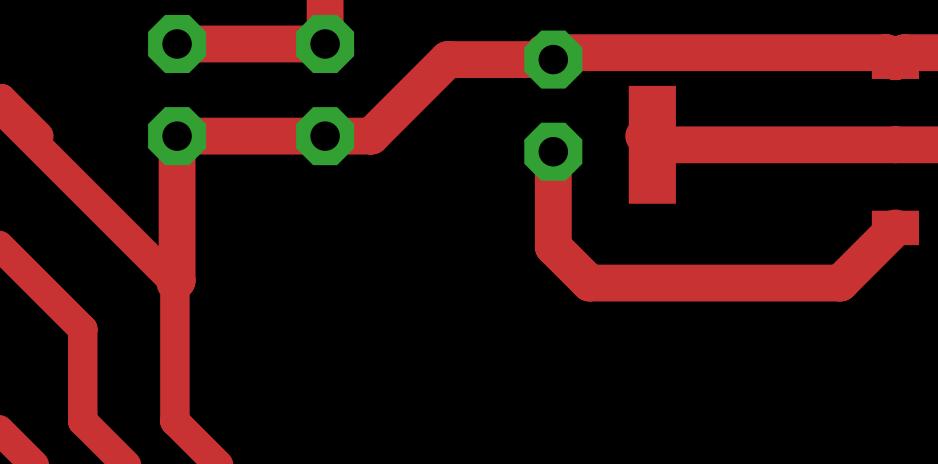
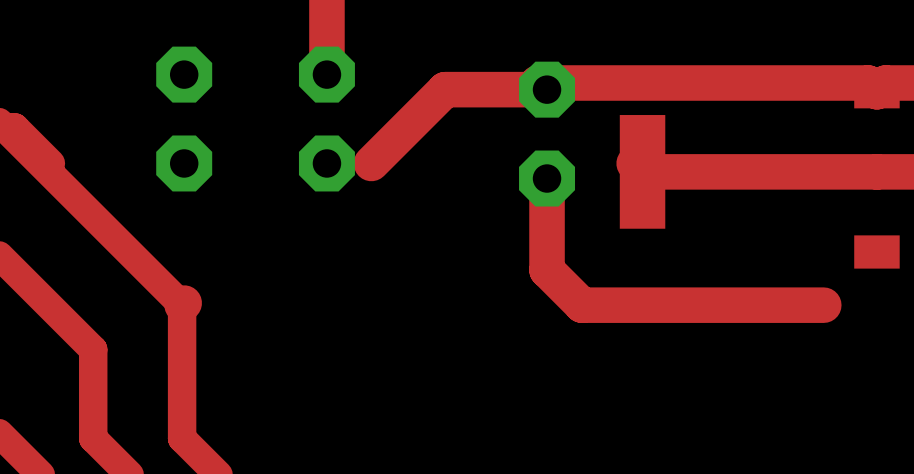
top track: (174, 41) (177, 43) (325, 43) -> none
top track: (177, 136) (177, 280) -> none
top track: (371, 136) (183, 136) (174, 144) -> none
top track: (895, 227) (840, 283) -> none

